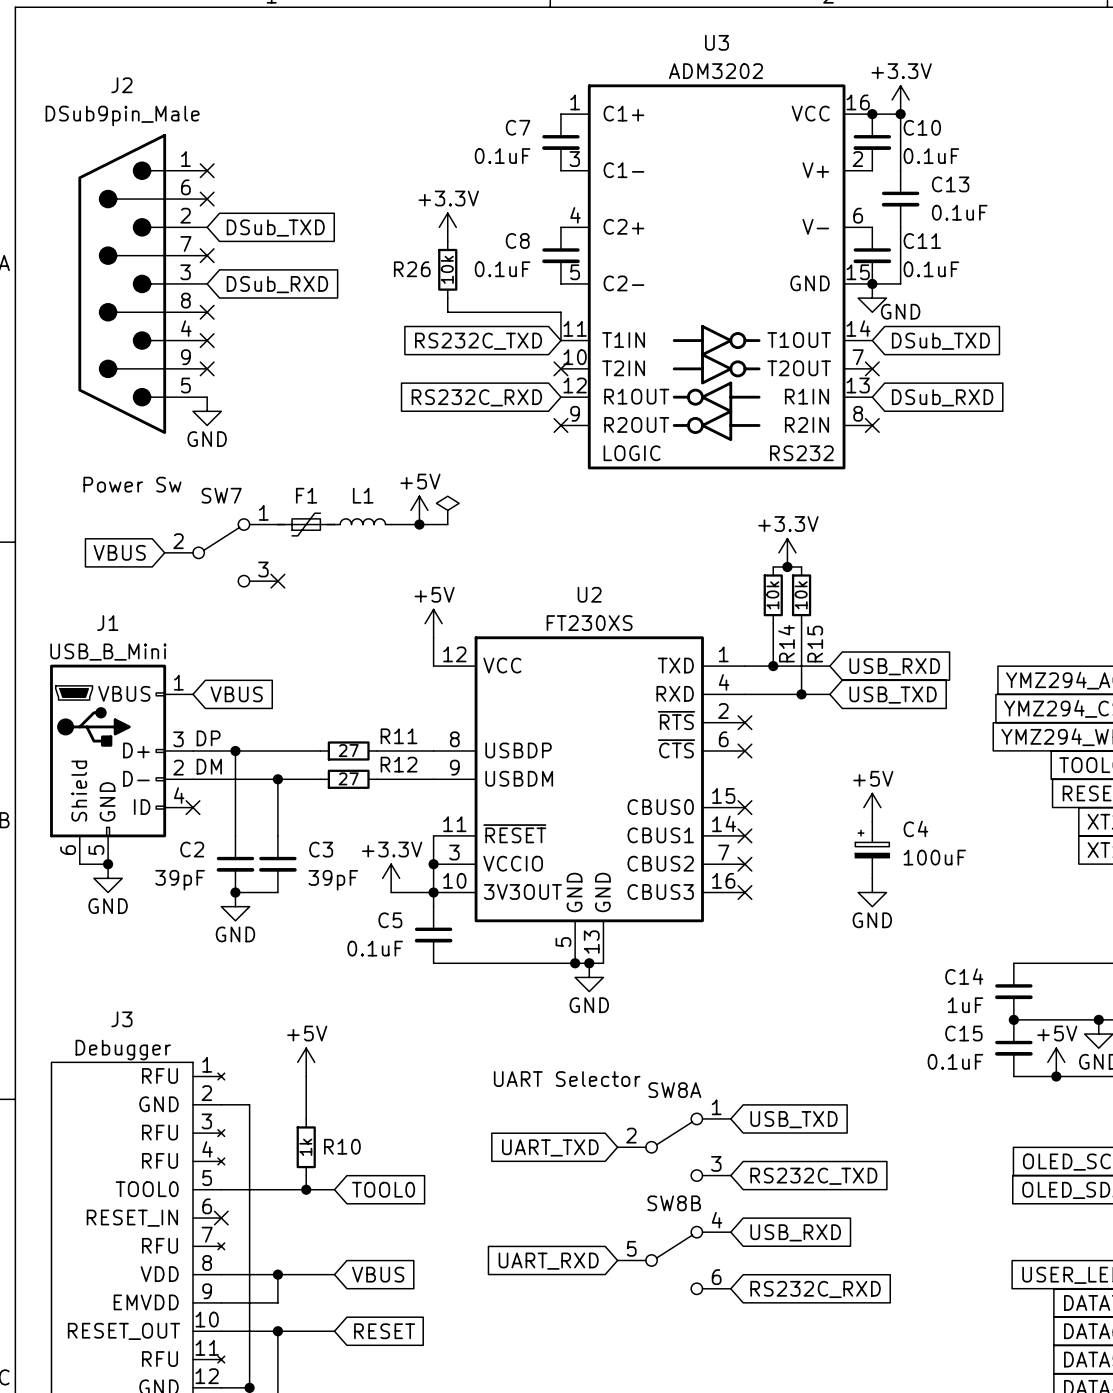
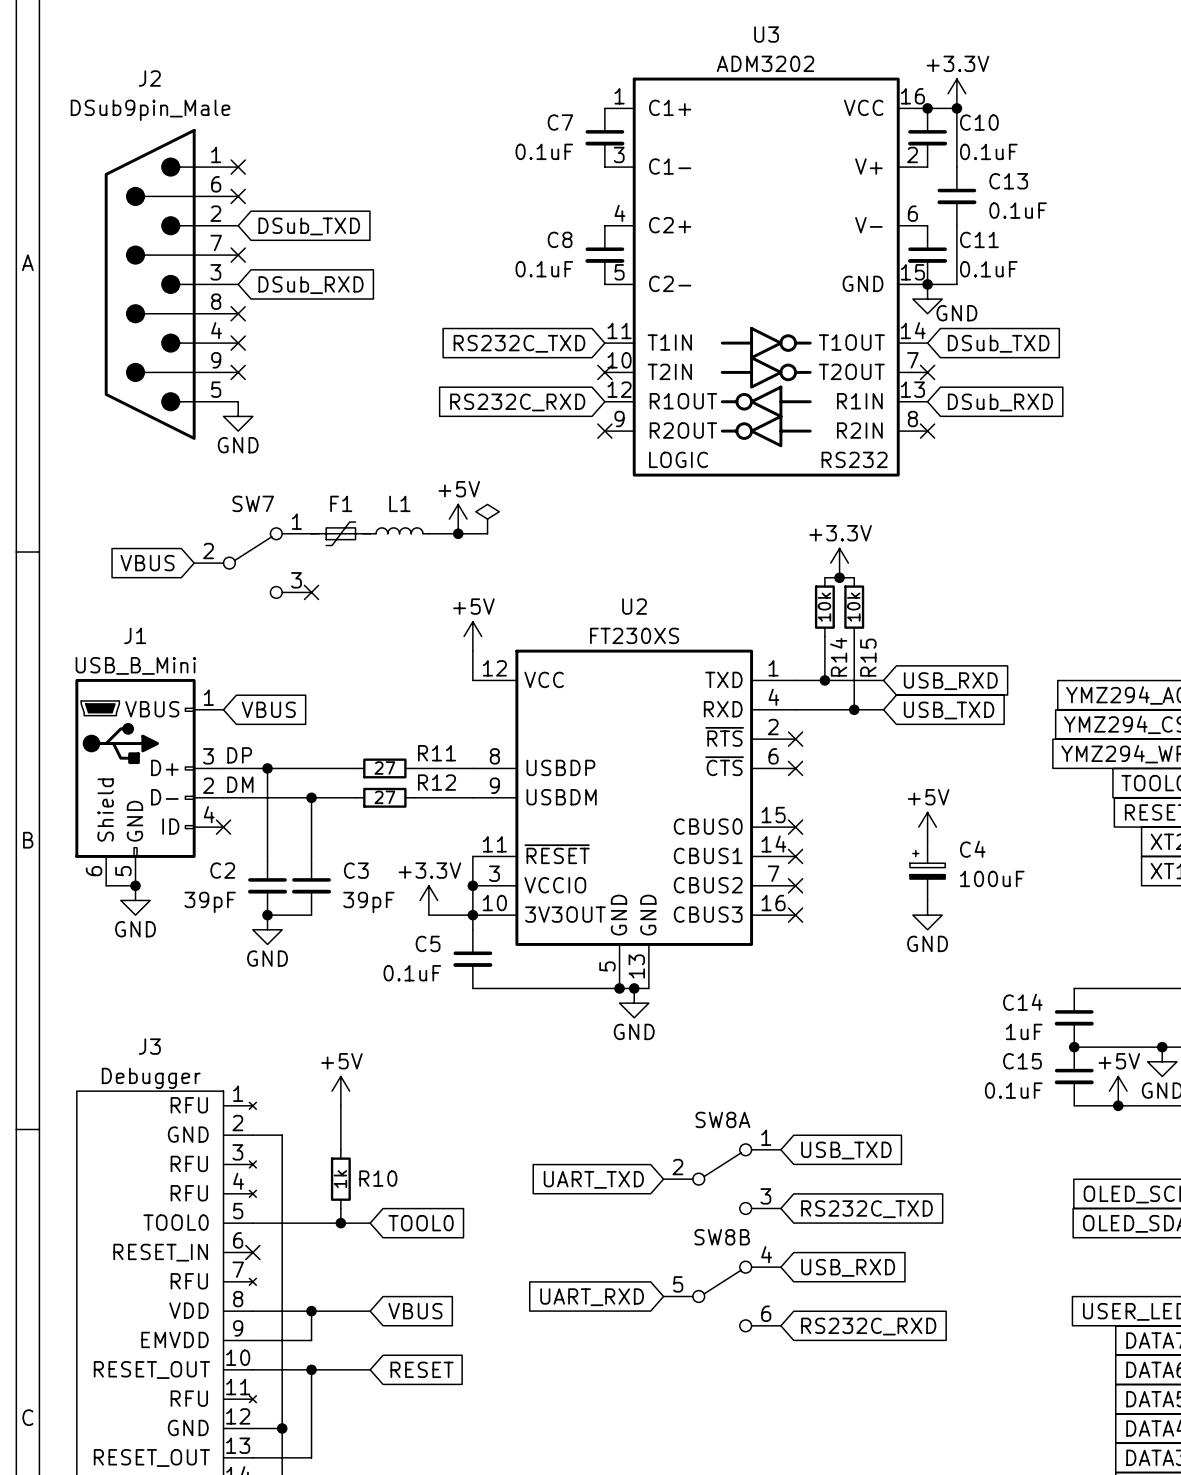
power symbol: +3.3V (447, 227) -> none
R26: 10k (447, 269) -> none
wire: (447, 298) (447, 312) (560, 312) (560, 340) -> none
text: Power Sw (132, 484) -> none
text: UART Selector (567, 1079) -> none

